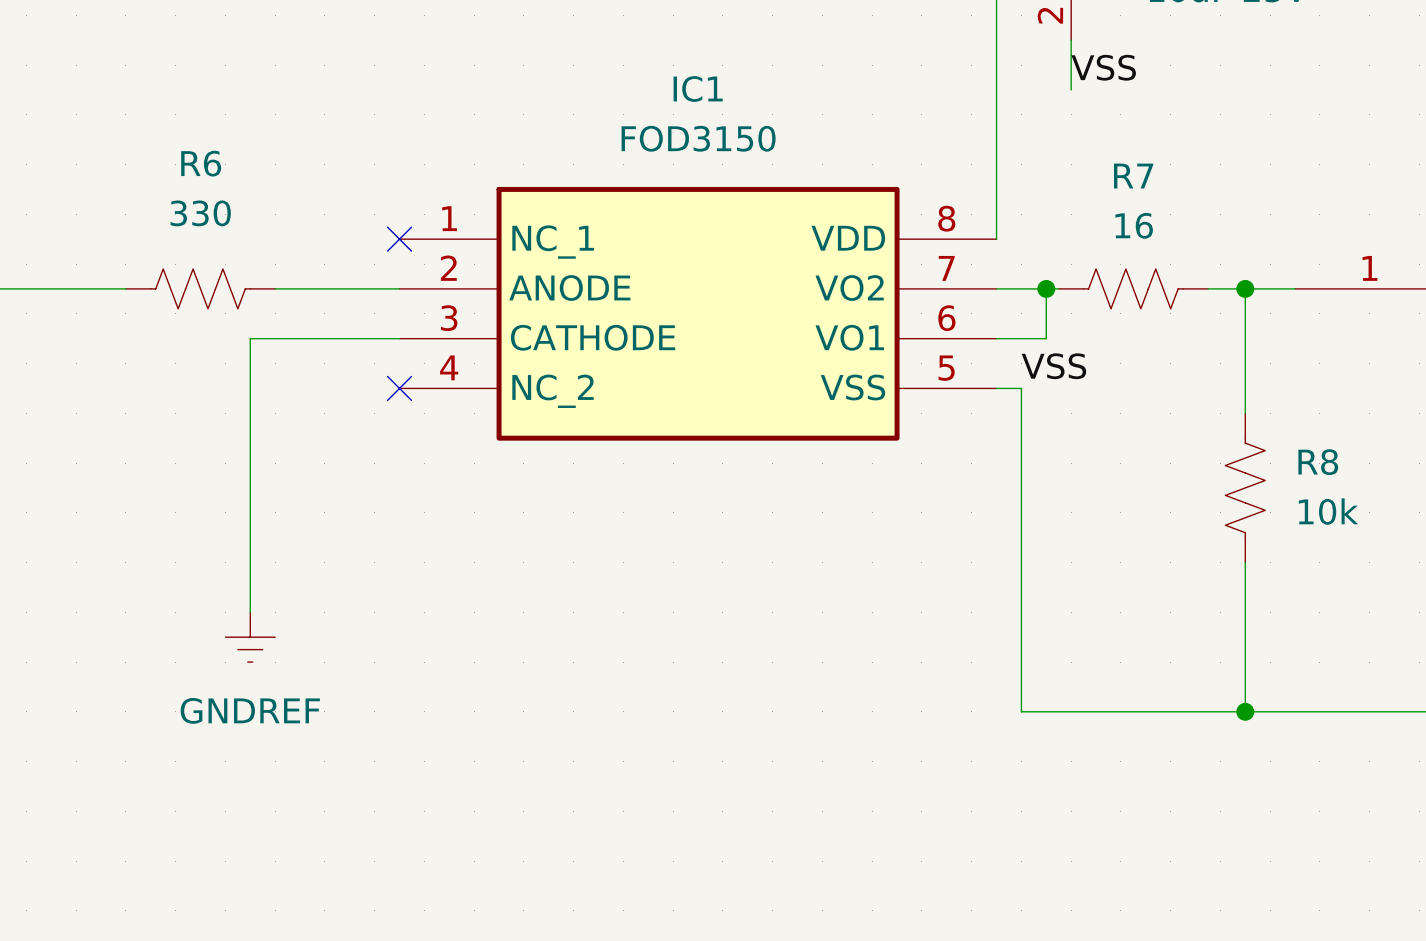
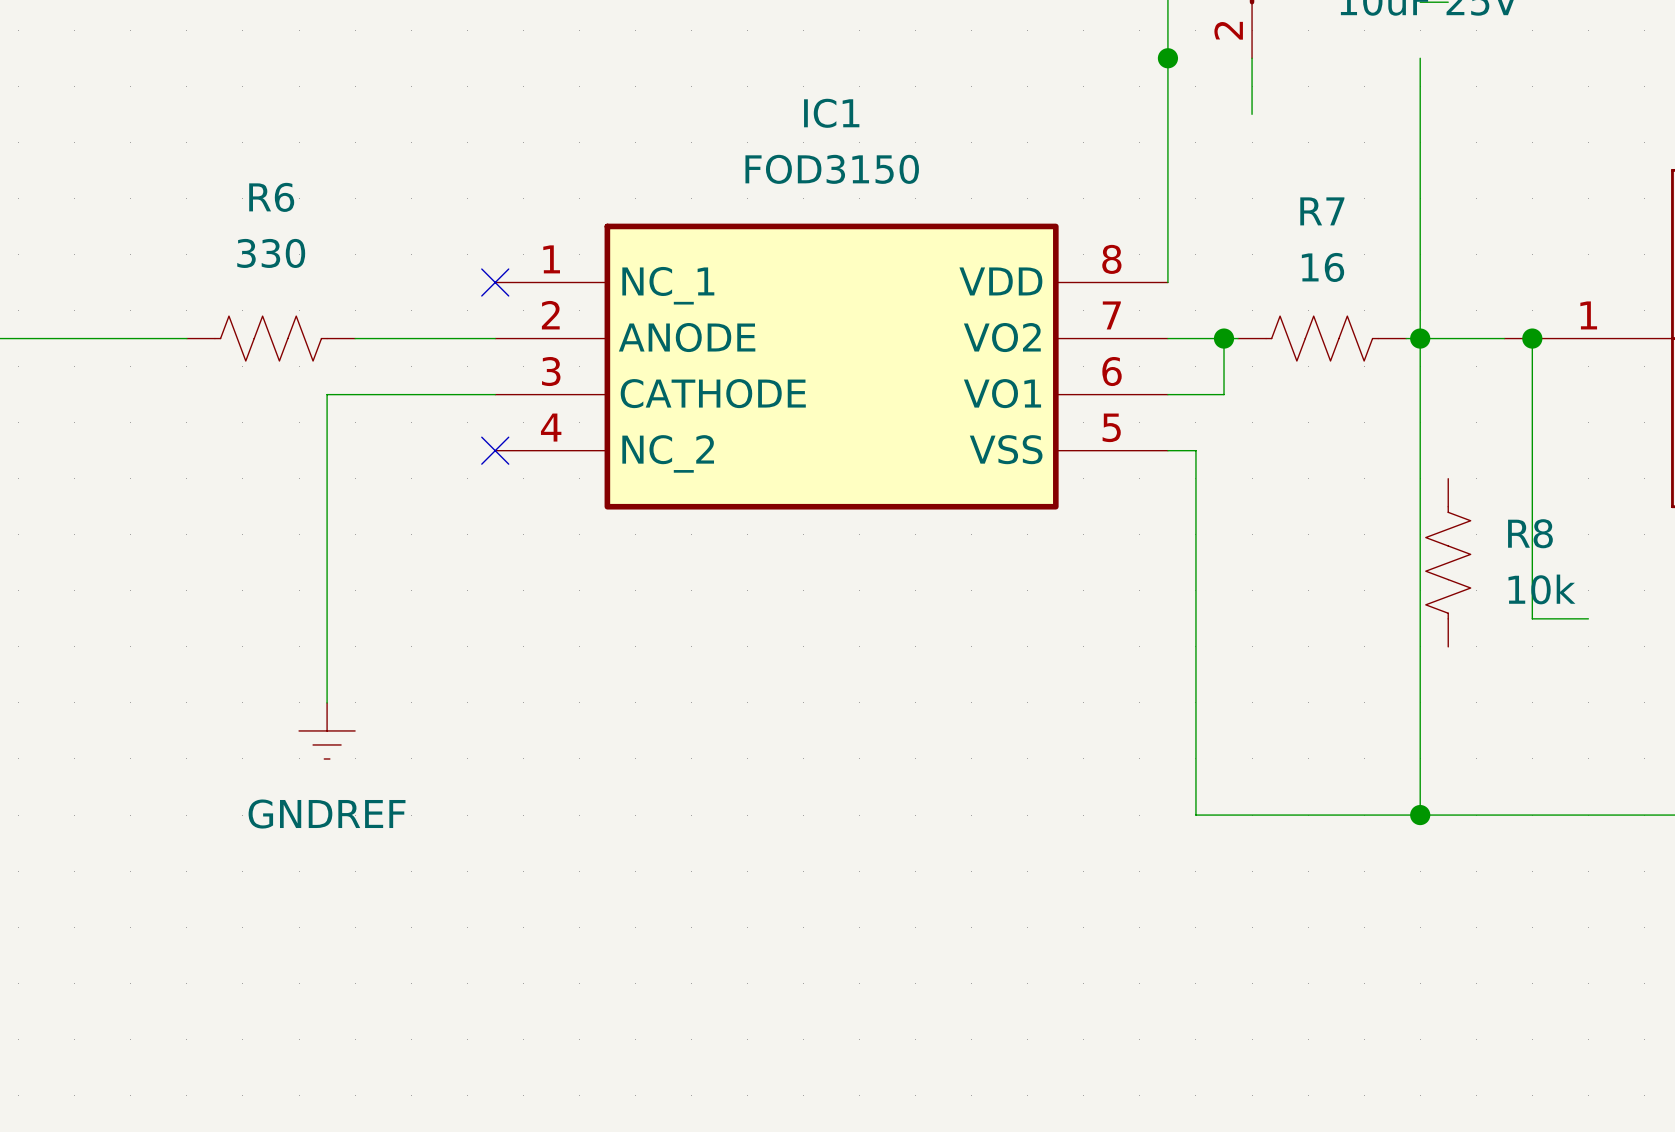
junction: none -> (1167, 58)
wire: none -> (1420, 58) (1420, 815)
label: VSS (1103, 67) -> none
wire: (1245, 288) (1245, 413) -> none
junction position: (1245, 288) -> (1420, 338)
wire: none -> (1532, 338) (1532, 618) (1588, 618)
junction: none -> (1532, 338)
label: VSS (1053, 366) -> none
wire: (1245, 562) (1245, 711) -> none
junction position: (1245, 711) -> (1420, 815)

